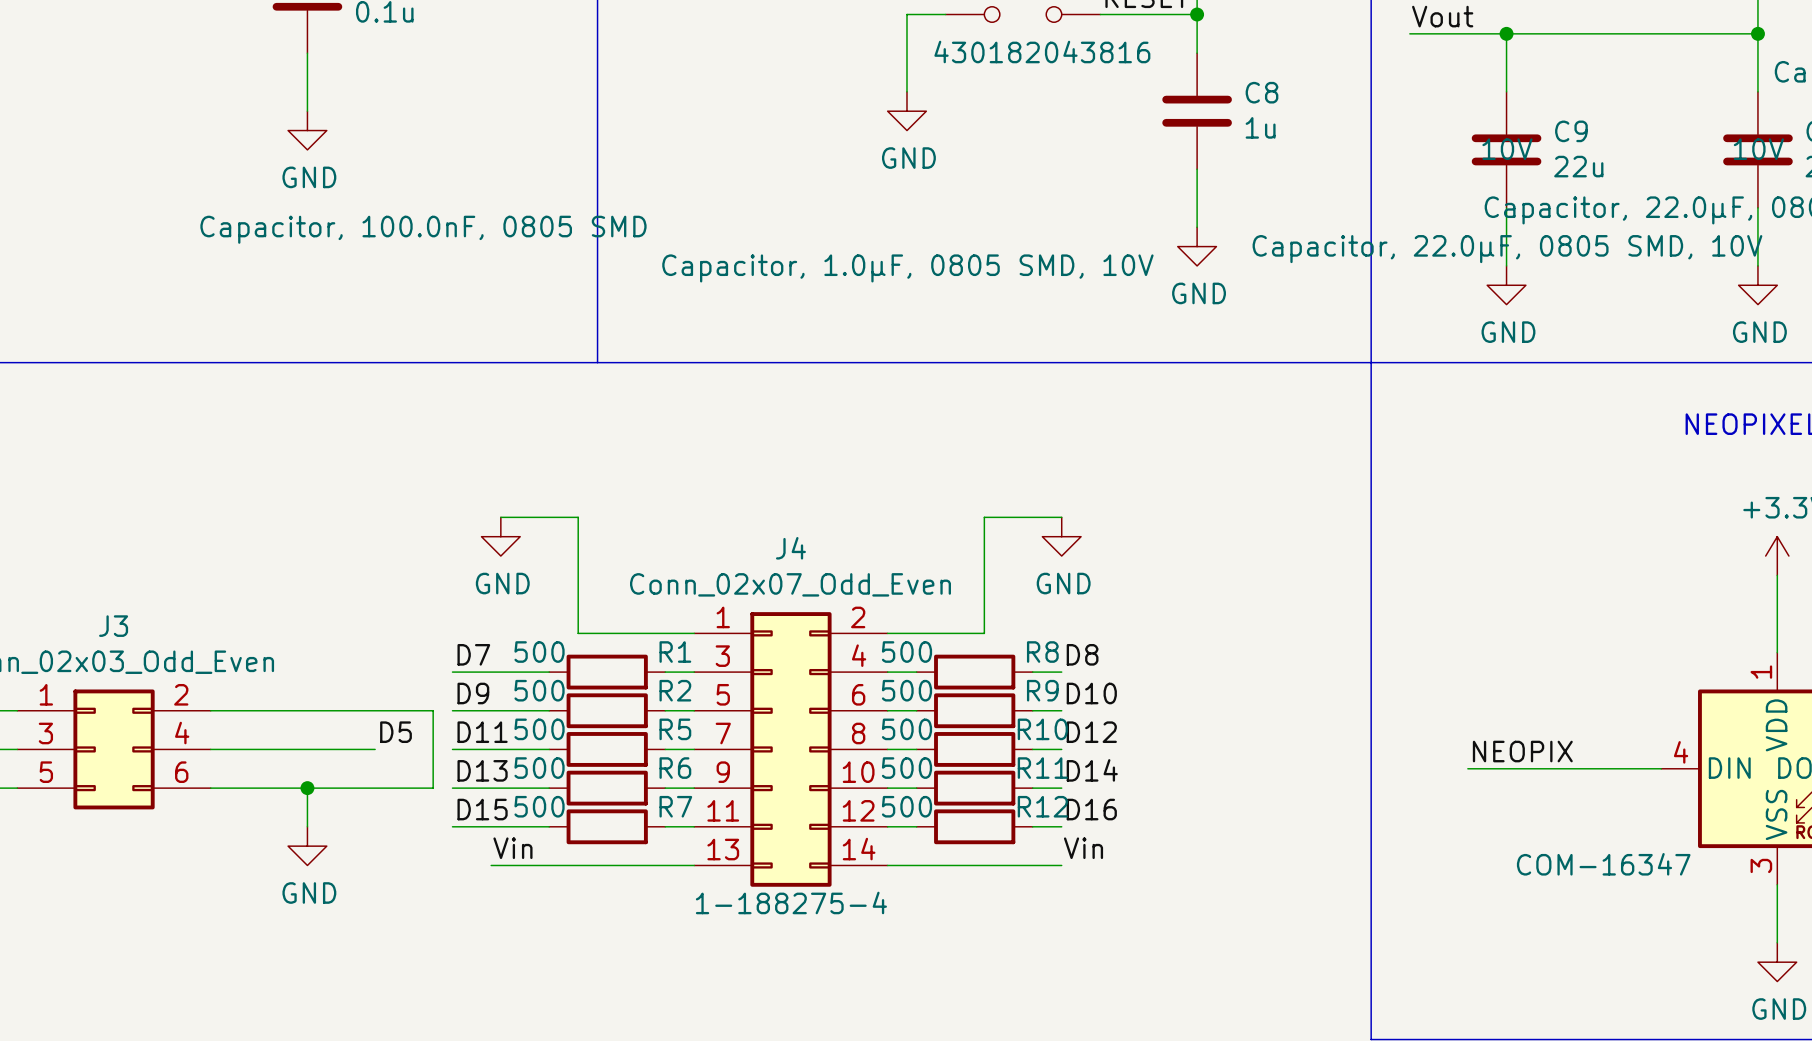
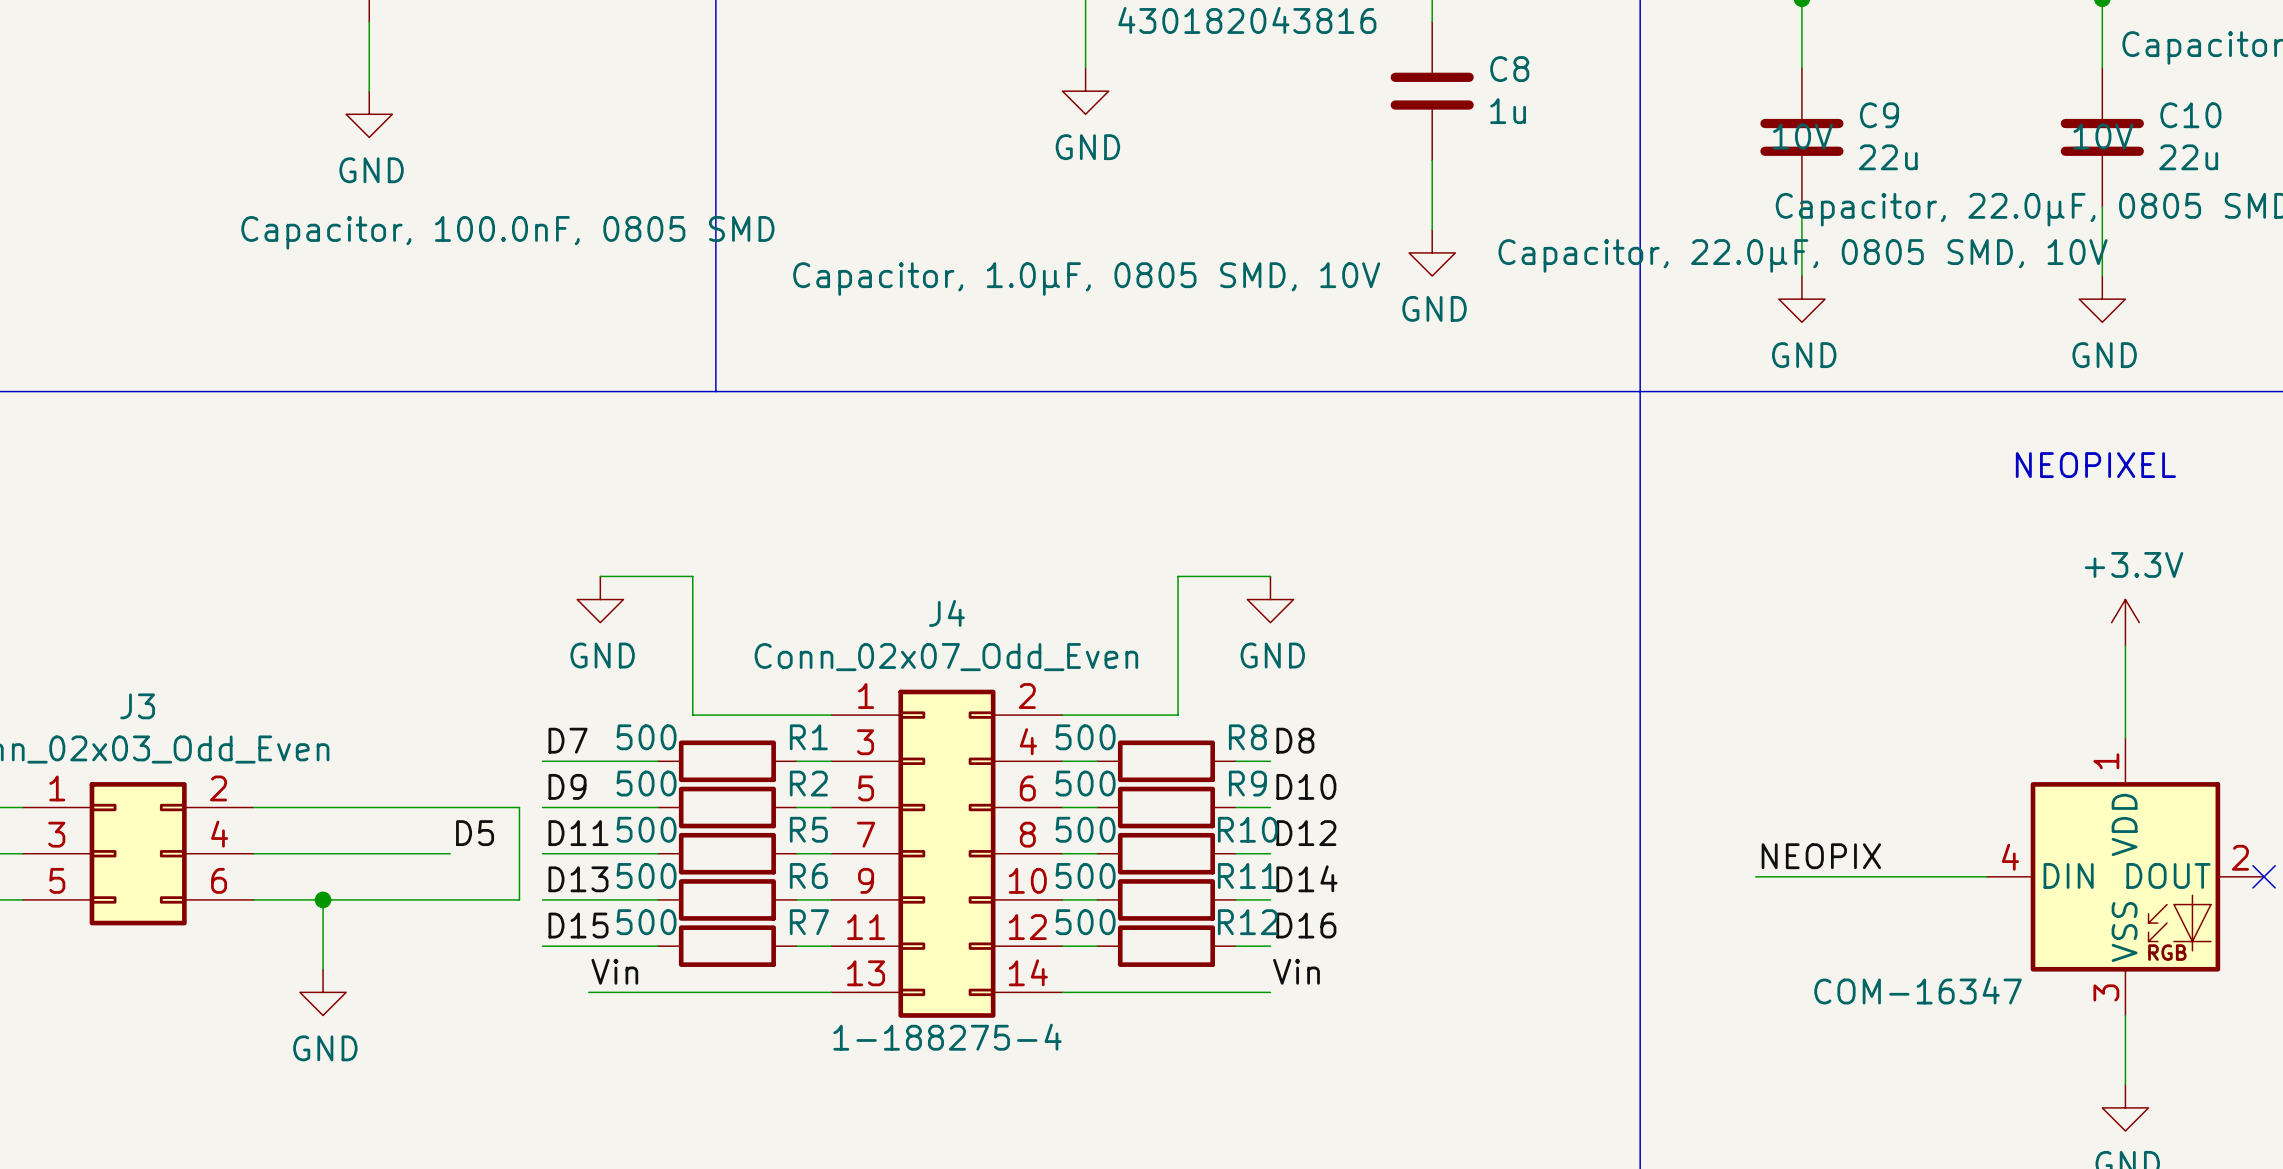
wire: none -> (323, 899) (323, 969)
wire: (307, 788) (307, 826) -> none
junction position: (307, 788) -> (323, 899)
power symbol position: GND (307, 846) -> GND (323, 992)

